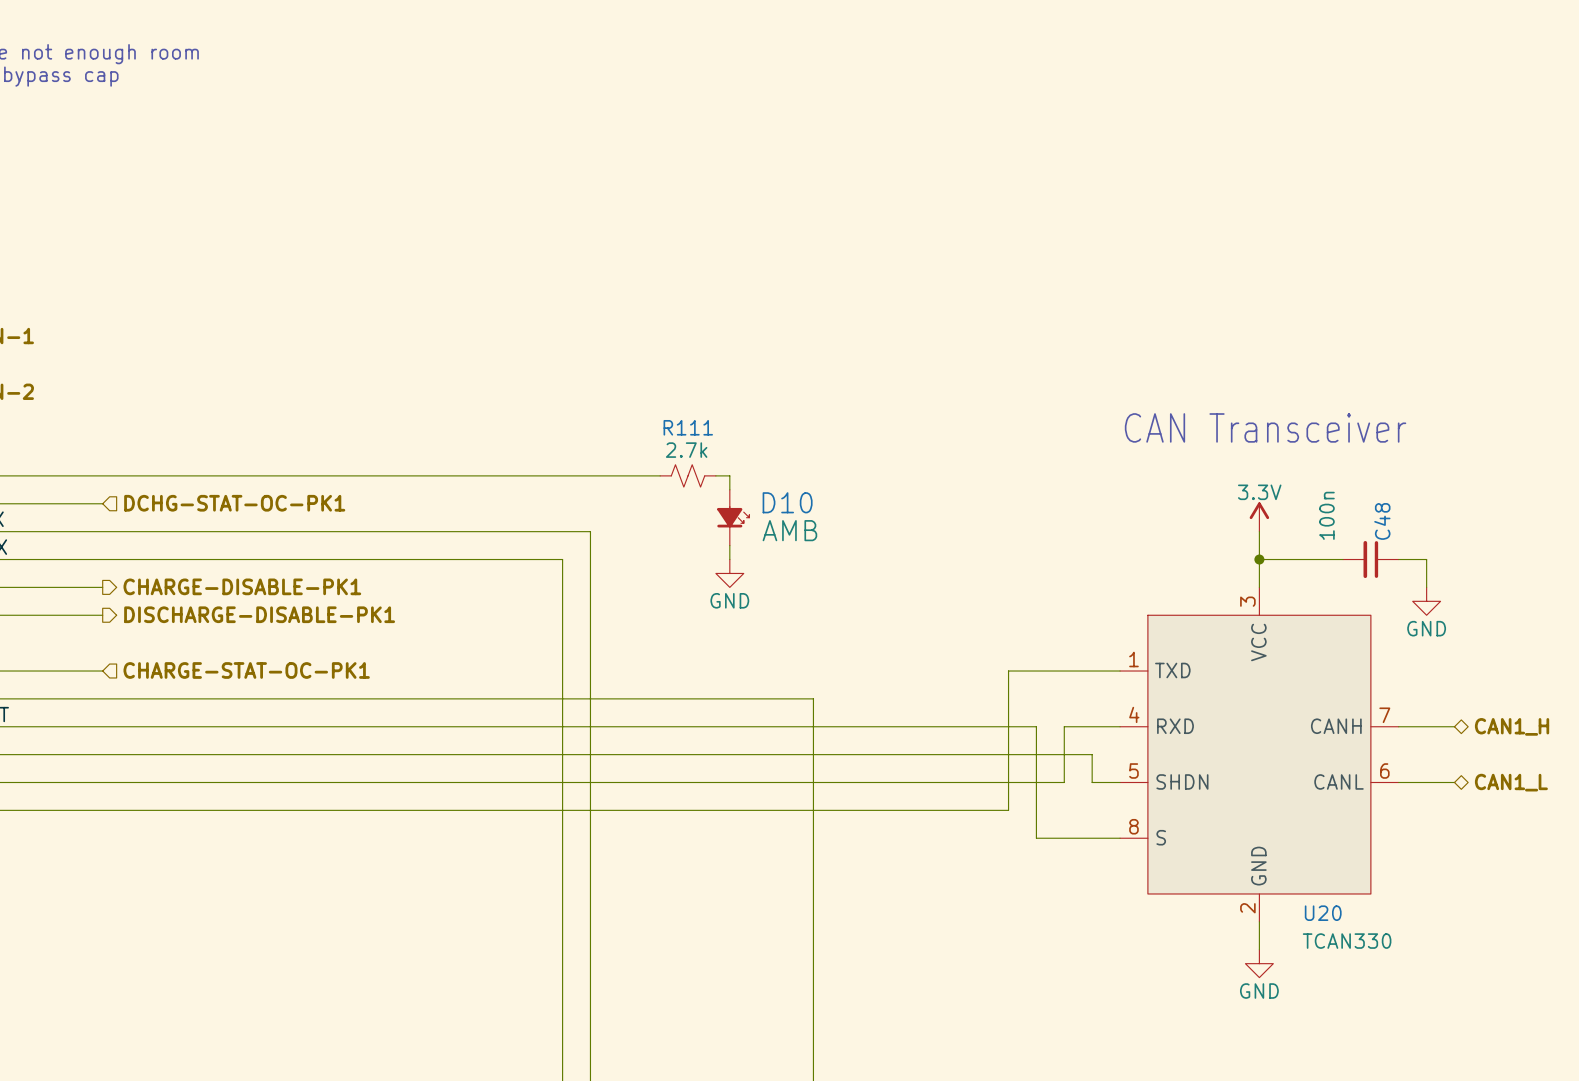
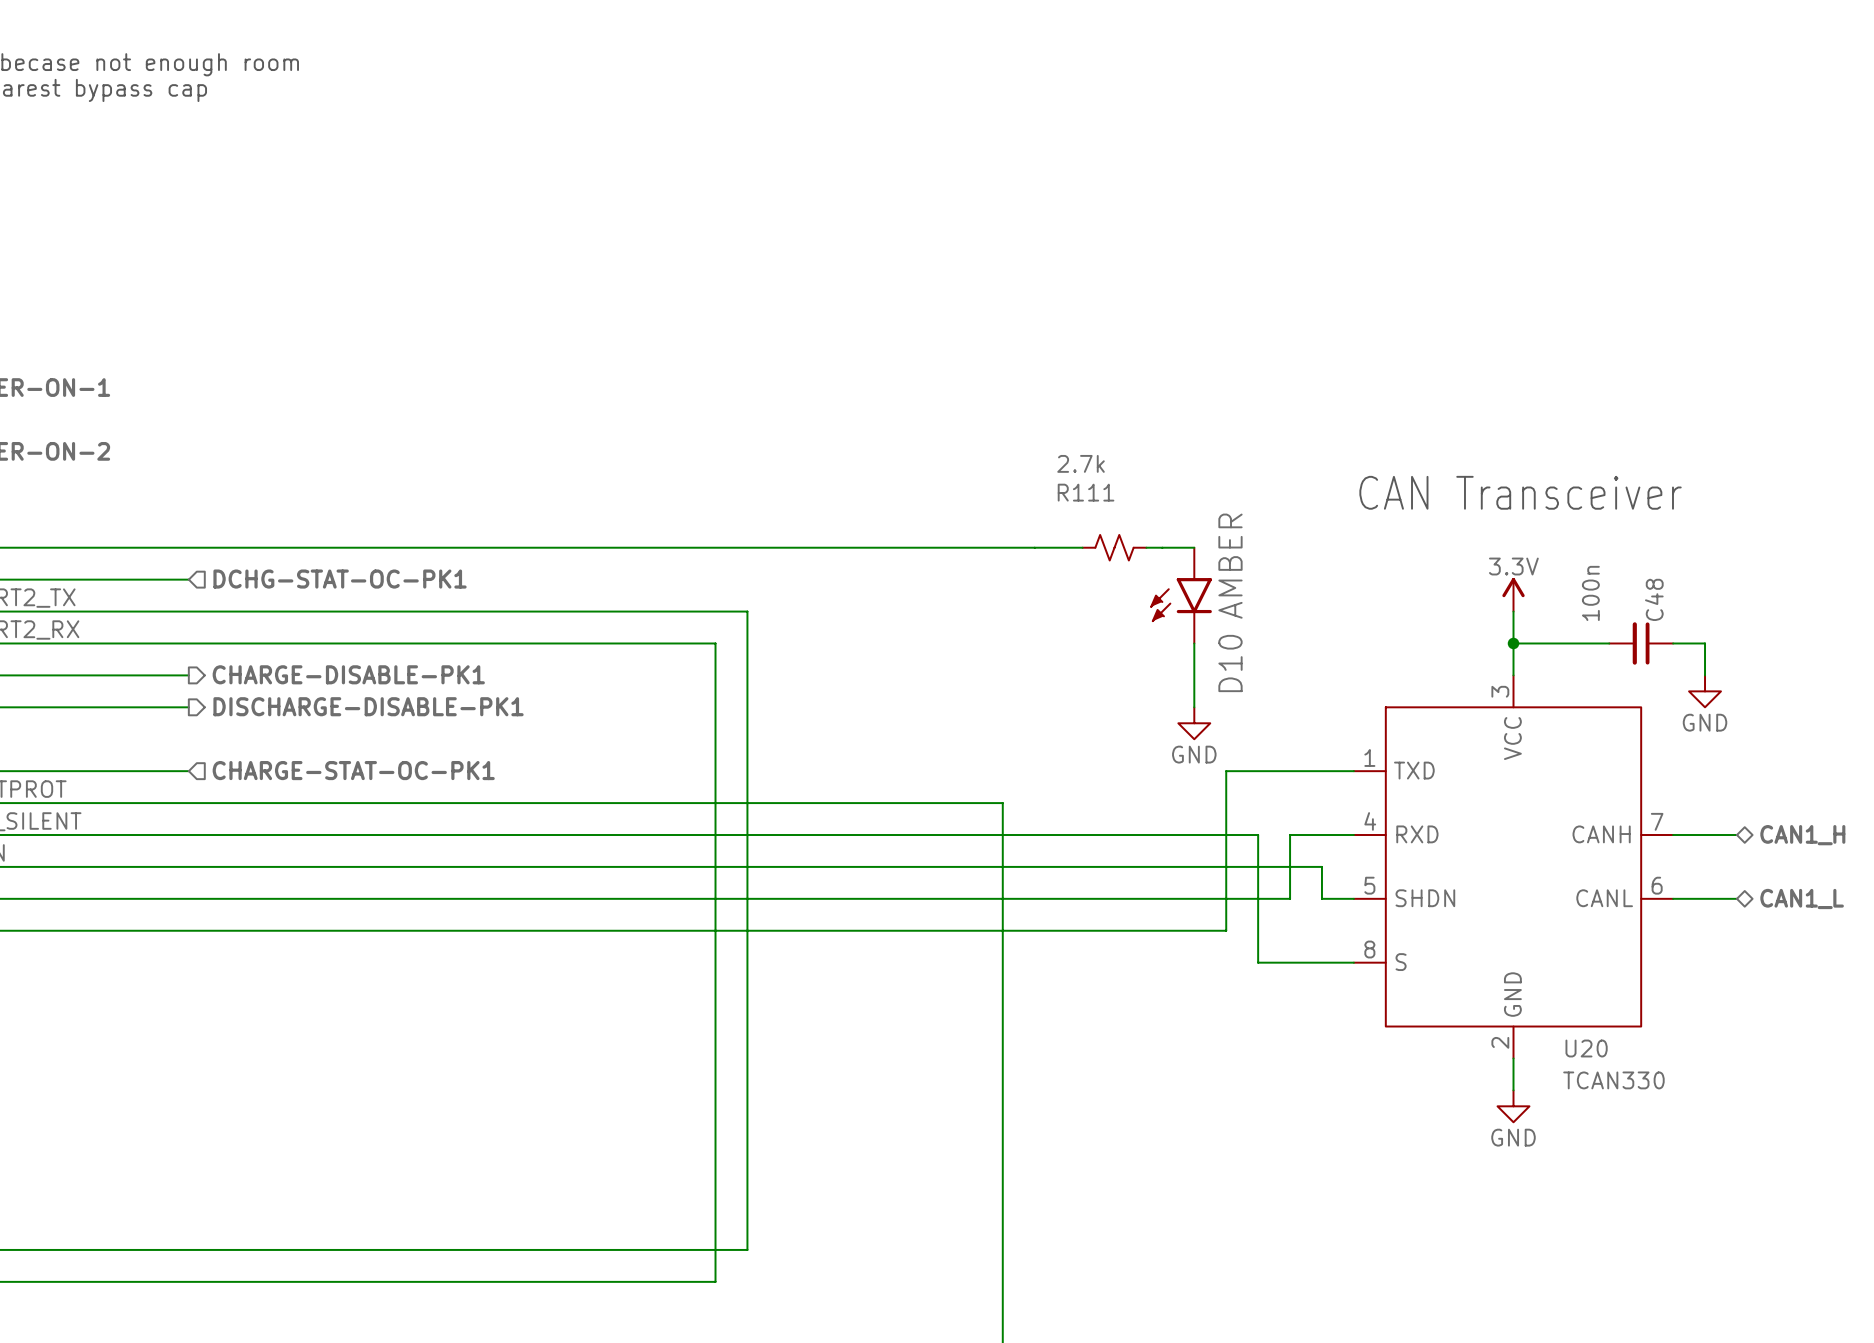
R111 name position: R111 (688, 427) -> R111 (1086, 492)
R111 value position: 2.7k (686, 450) -> 2.7k (1081, 463)
R111 position: (688, 475) -> (1114, 547)
wire: (729, 475) (729, 489) -> (907, 547) (1082, 547)
wire: none -> (1146, 547) (1194, 547)
D10 symbol: [717, 489, 750, 546] -> [1150, 547, 1212, 644]
D10 name position: D10 (787, 502) -> D10 (1230, 663)
D10 value: AMB (789, 530) -> AMBER (1230, 566)
wire: (729, 545) (729, 559) -> none
wire: none -> (1194, 643) (1194, 707)
power symbol position: GND (729, 573) -> GND (1194, 723)

